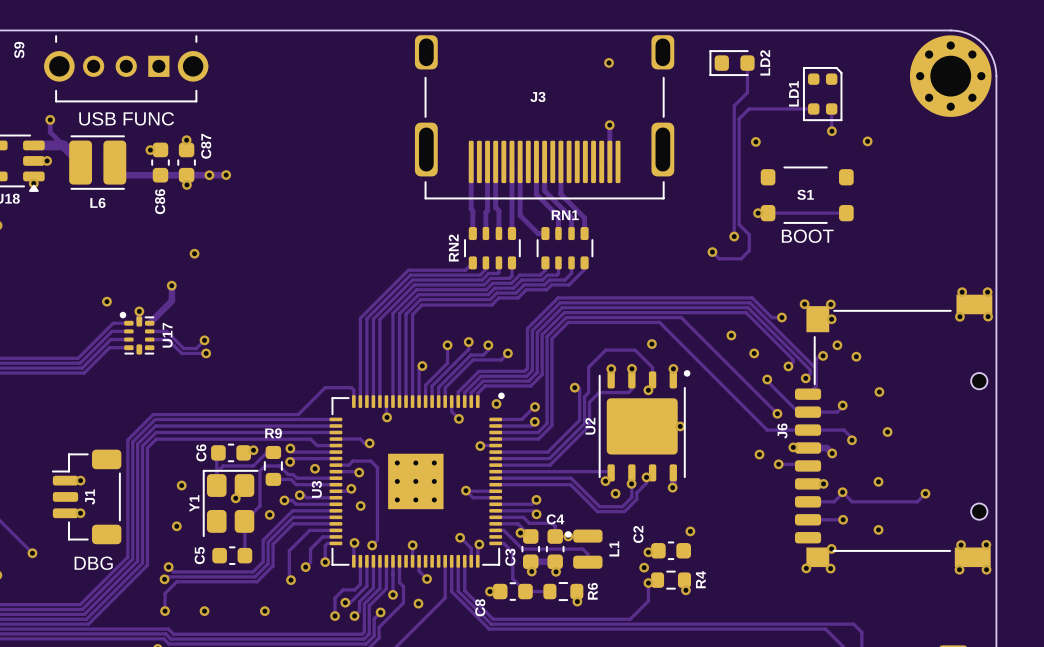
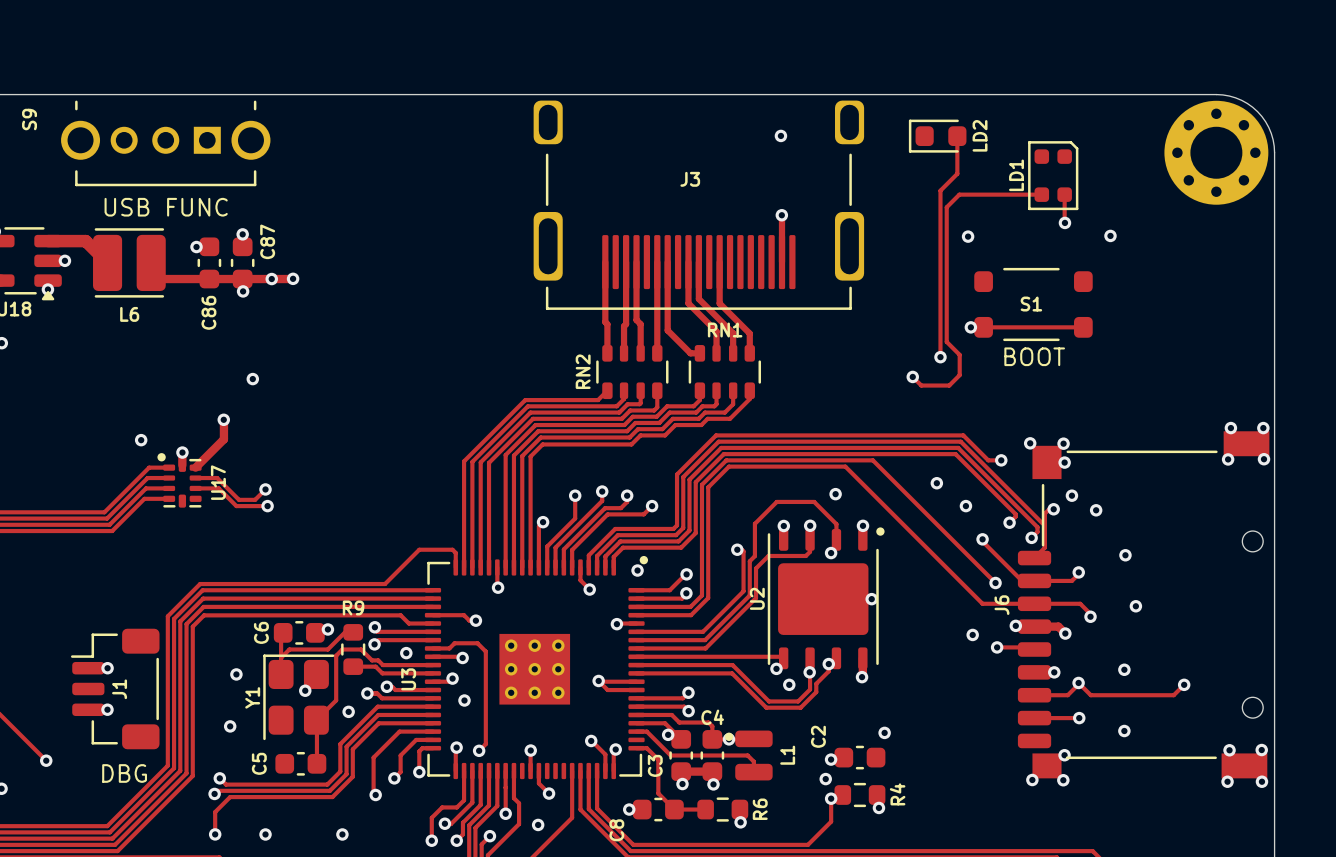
track: (50, 119) (50, 132) (63, 145) -> none
via: (50, 119) -> none

